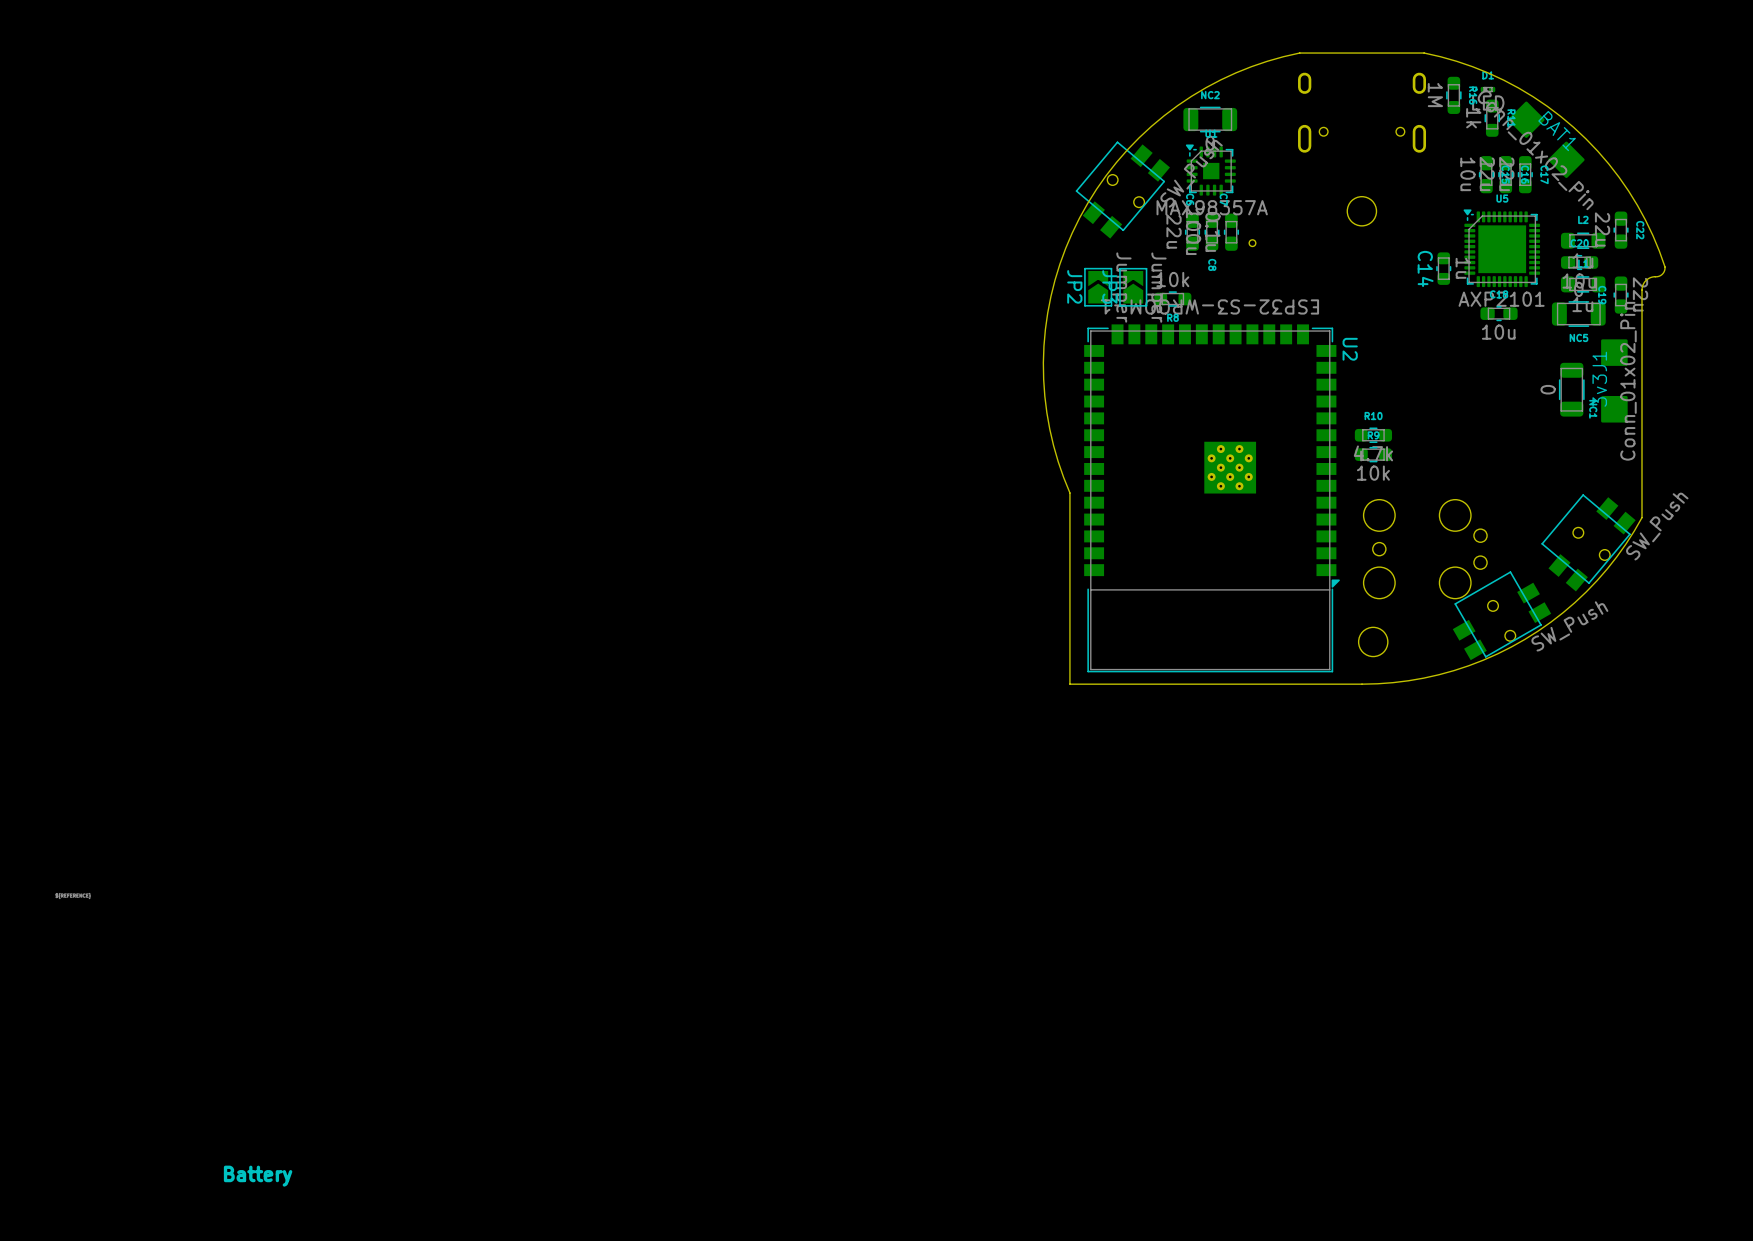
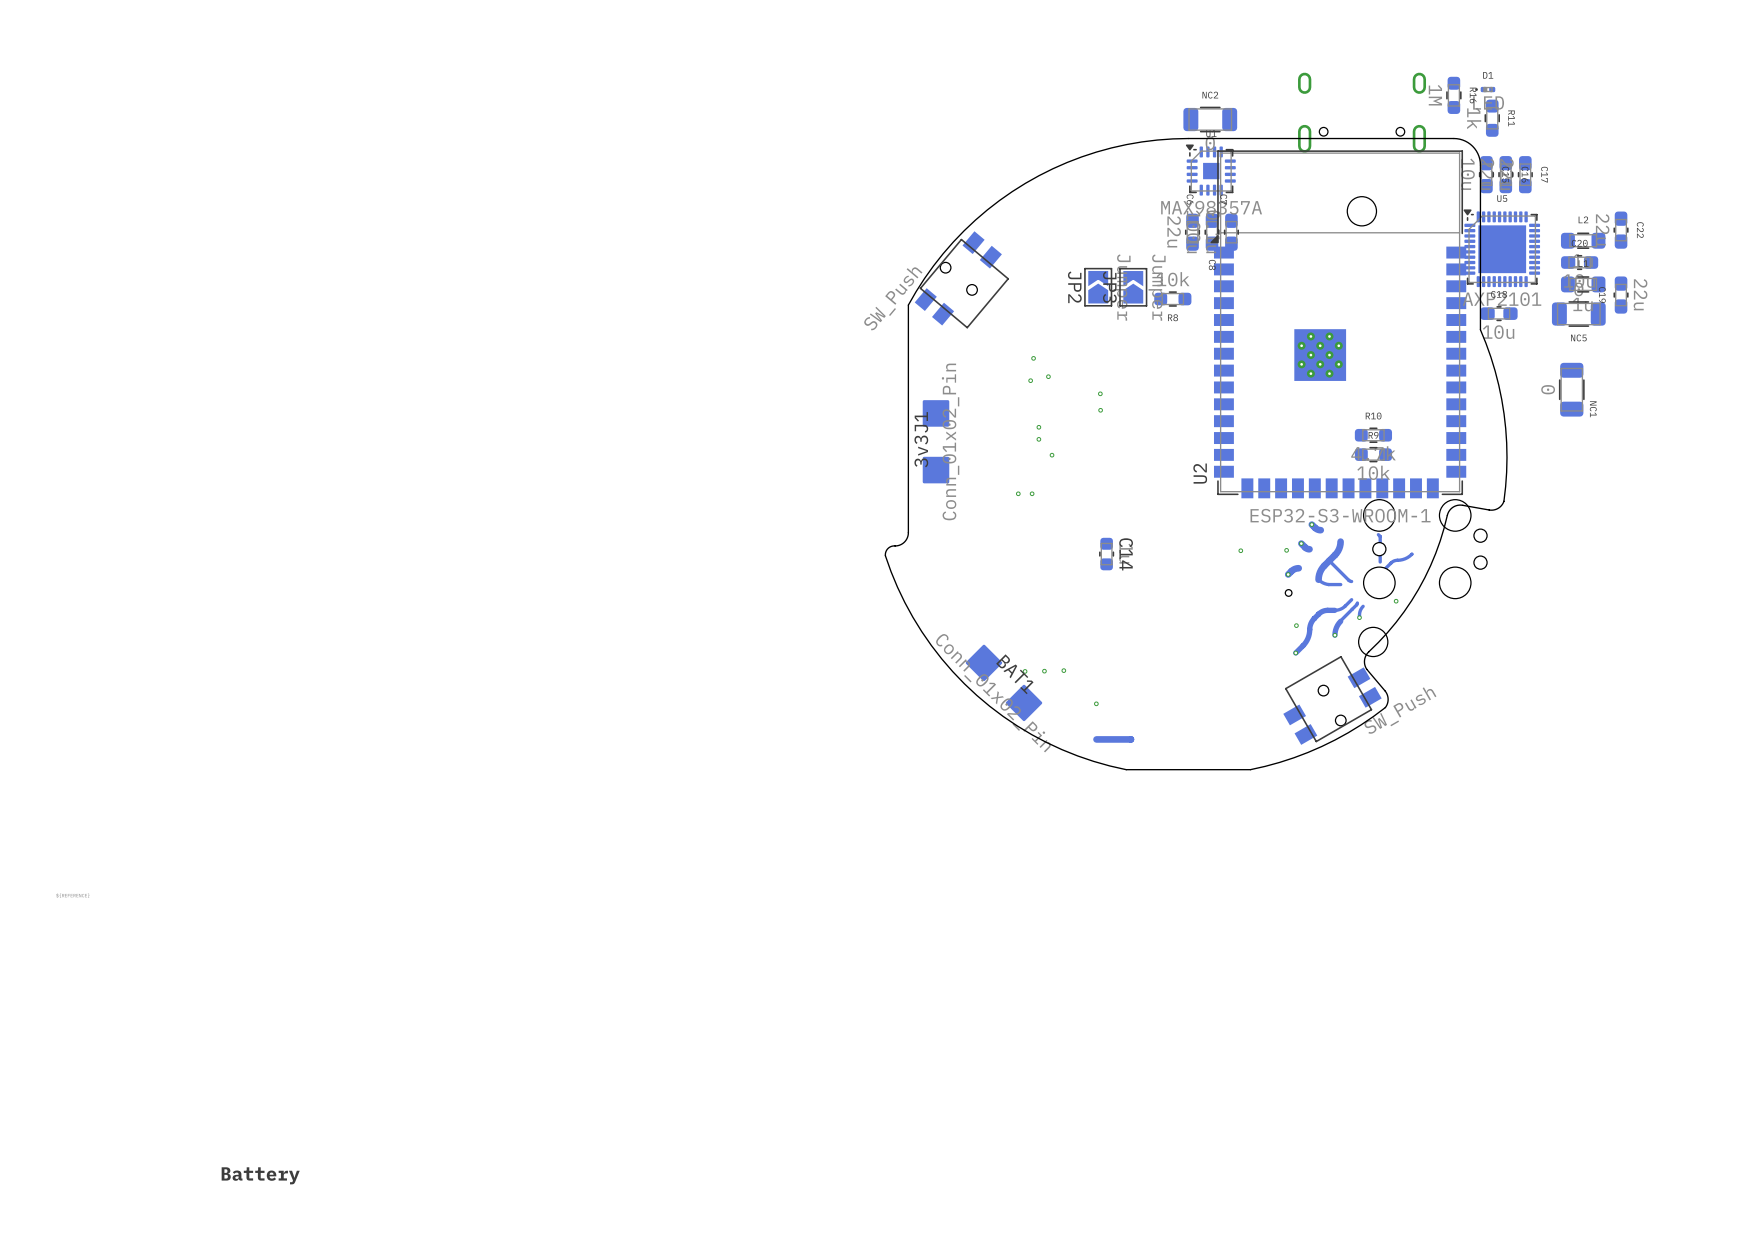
board edge: (1424, 53) (1299, 53) (1267, 61) (1235, 72) (1191, 96) (1151, 126) (1116, 162) (1087, 203) (1072, 233) (1059, 264) (1047, 312) (1043, 346) (1043, 379) (1049, 429) (1058, 461) (1069, 492) (1069, 684) (1377, 683) (1408, 680) (1453, 670) (1483, 660) (1511, 647) (1538, 631) (1563, 612) (1586, 591) (1607, 569) (1625, 544) (1642, 517) (1642, 288) (1647, 279) (1660, 275) (1665, 268) (1652, 235) (1637, 205) (1618, 177) (1585, 138) (1560, 116) (1533, 96) (1488, 73) (1456, 61) (1424, 53) -> none
BAT1 position: (1546, 139) -> (1004, 682)
part rotation: 0° (1122, 190) -> 180° (961, 279)
part position: (1122, 190) -> (961, 279)
part: (1252, 243) -> none
C14 name position: C14 (1425, 268) -> C14 (1126, 554)
C14 position: (1443, 268) -> (1106, 554)
via: none -> (1033, 358)
via: none -> (1048, 376)
via: none -> (1030, 380)
3v3J1 position: (1614, 380) -> (936, 441)
via: none -> (1100, 393)
via: none -> (1100, 410)
via: none -> (1038, 427)
via: none -> (1038, 439)
via: none -> (1052, 455)
via: none -> (1018, 493)
via: none -> (1032, 493)
U2 rotation: 0° (1212, 498) -> 180° (1338, 324)
U2 position: (1212, 498) -> (1338, 324)
track: none -> (1311, 524) (1320, 530)
via: none -> (1311, 524)
track: none -> (1378, 534) (1380, 536) (1380, 561)
track: none -> (1340, 541) (1336, 553) (1321, 569) (1318, 579) (1326, 584) (1340, 584)
part: SW_Push (1588, 542) -> none
track: none -> (1301, 543) (1309, 549)
via: none -> (1301, 543)
via: none -> (1240, 550)
via: none -> (1286, 550)
track: none -> (1412, 554) (1405, 558) (1392, 561) (1382, 573)
track: none -> (1329, 560) (1351, 581)
track: none -> (1298, 568) (1288, 574)
via: none -> (1288, 574)
part: none -> (1288, 592)
track: none -> (1351, 599) (1340, 609) (1325, 610) (1318, 614) (1310, 623) (1307, 640) (1295, 652)
via: none -> (1396, 601)
track: none -> (1357, 603) (1341, 620)
track: none -> (1363, 606) (1359, 617)
part position: (1502, 615) -> (1332, 700)
via: none -> (1359, 617)
track: none -> (1340, 621) (1334, 635)
via: none -> (1296, 625)
via: none -> (1334, 635)
via: none -> (1295, 652)
via: none -> (1063, 670)
via: none -> (1025, 671)
via: none -> (1044, 671)
via: none -> (1096, 703)
track: none -> (1130, 739) (1096, 739)
board edge: none -> (1250, 769) (1293, 757) (1321, 746) (1348, 732) (1385, 707) (1387, 702) (1387, 694) (1365, 667) (1364, 661) (1365, 655) (1396, 622) (1418, 589) (1435, 553) (1450, 509) (1461, 505) (1493, 509) (1499, 507) (1503, 501) (1507, 457) (1504, 413) (1495, 370) (1480, 329) (1480, 162) (1474, 148) (1462, 140) (1172, 138) (1126, 144) (1096, 152) (1067, 162) (1039, 175) (1012, 191) (987, 209) (964, 230) (943, 253) (924, 278) (908, 305) (908, 534) (902, 543) (887, 548) (885, 555) (904, 602) (931, 645) (964, 683) (989, 706) (1031, 734) (1077, 755) (1126, 769) (1250, 769)

